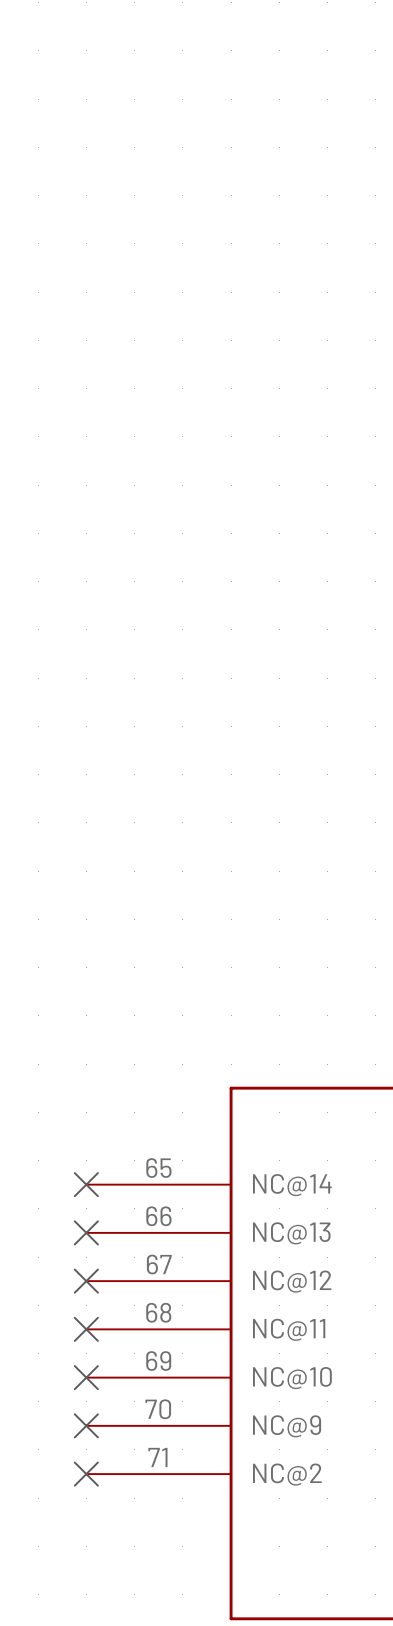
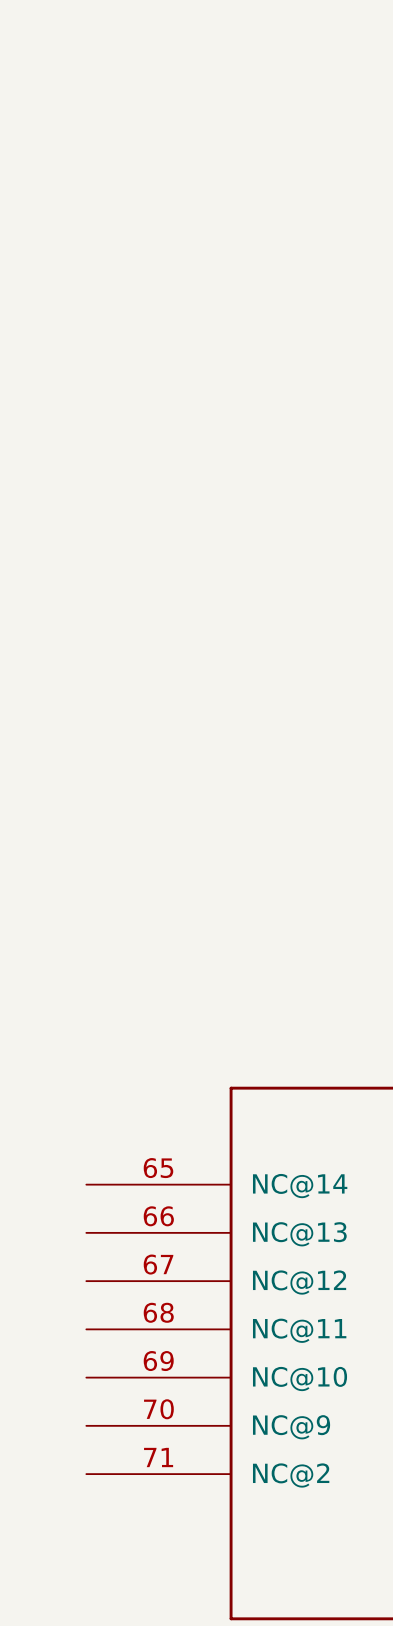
no-connect mark: (86, 1184) -> none
no-connect mark: (86, 1232) -> none
no-connect mark: (86, 1281) -> none
no-connect mark: (86, 1329) -> none
no-connect mark: (86, 1377) -> none
no-connect mark: (86, 1425) -> none
no-connect mark: (86, 1474) -> none

